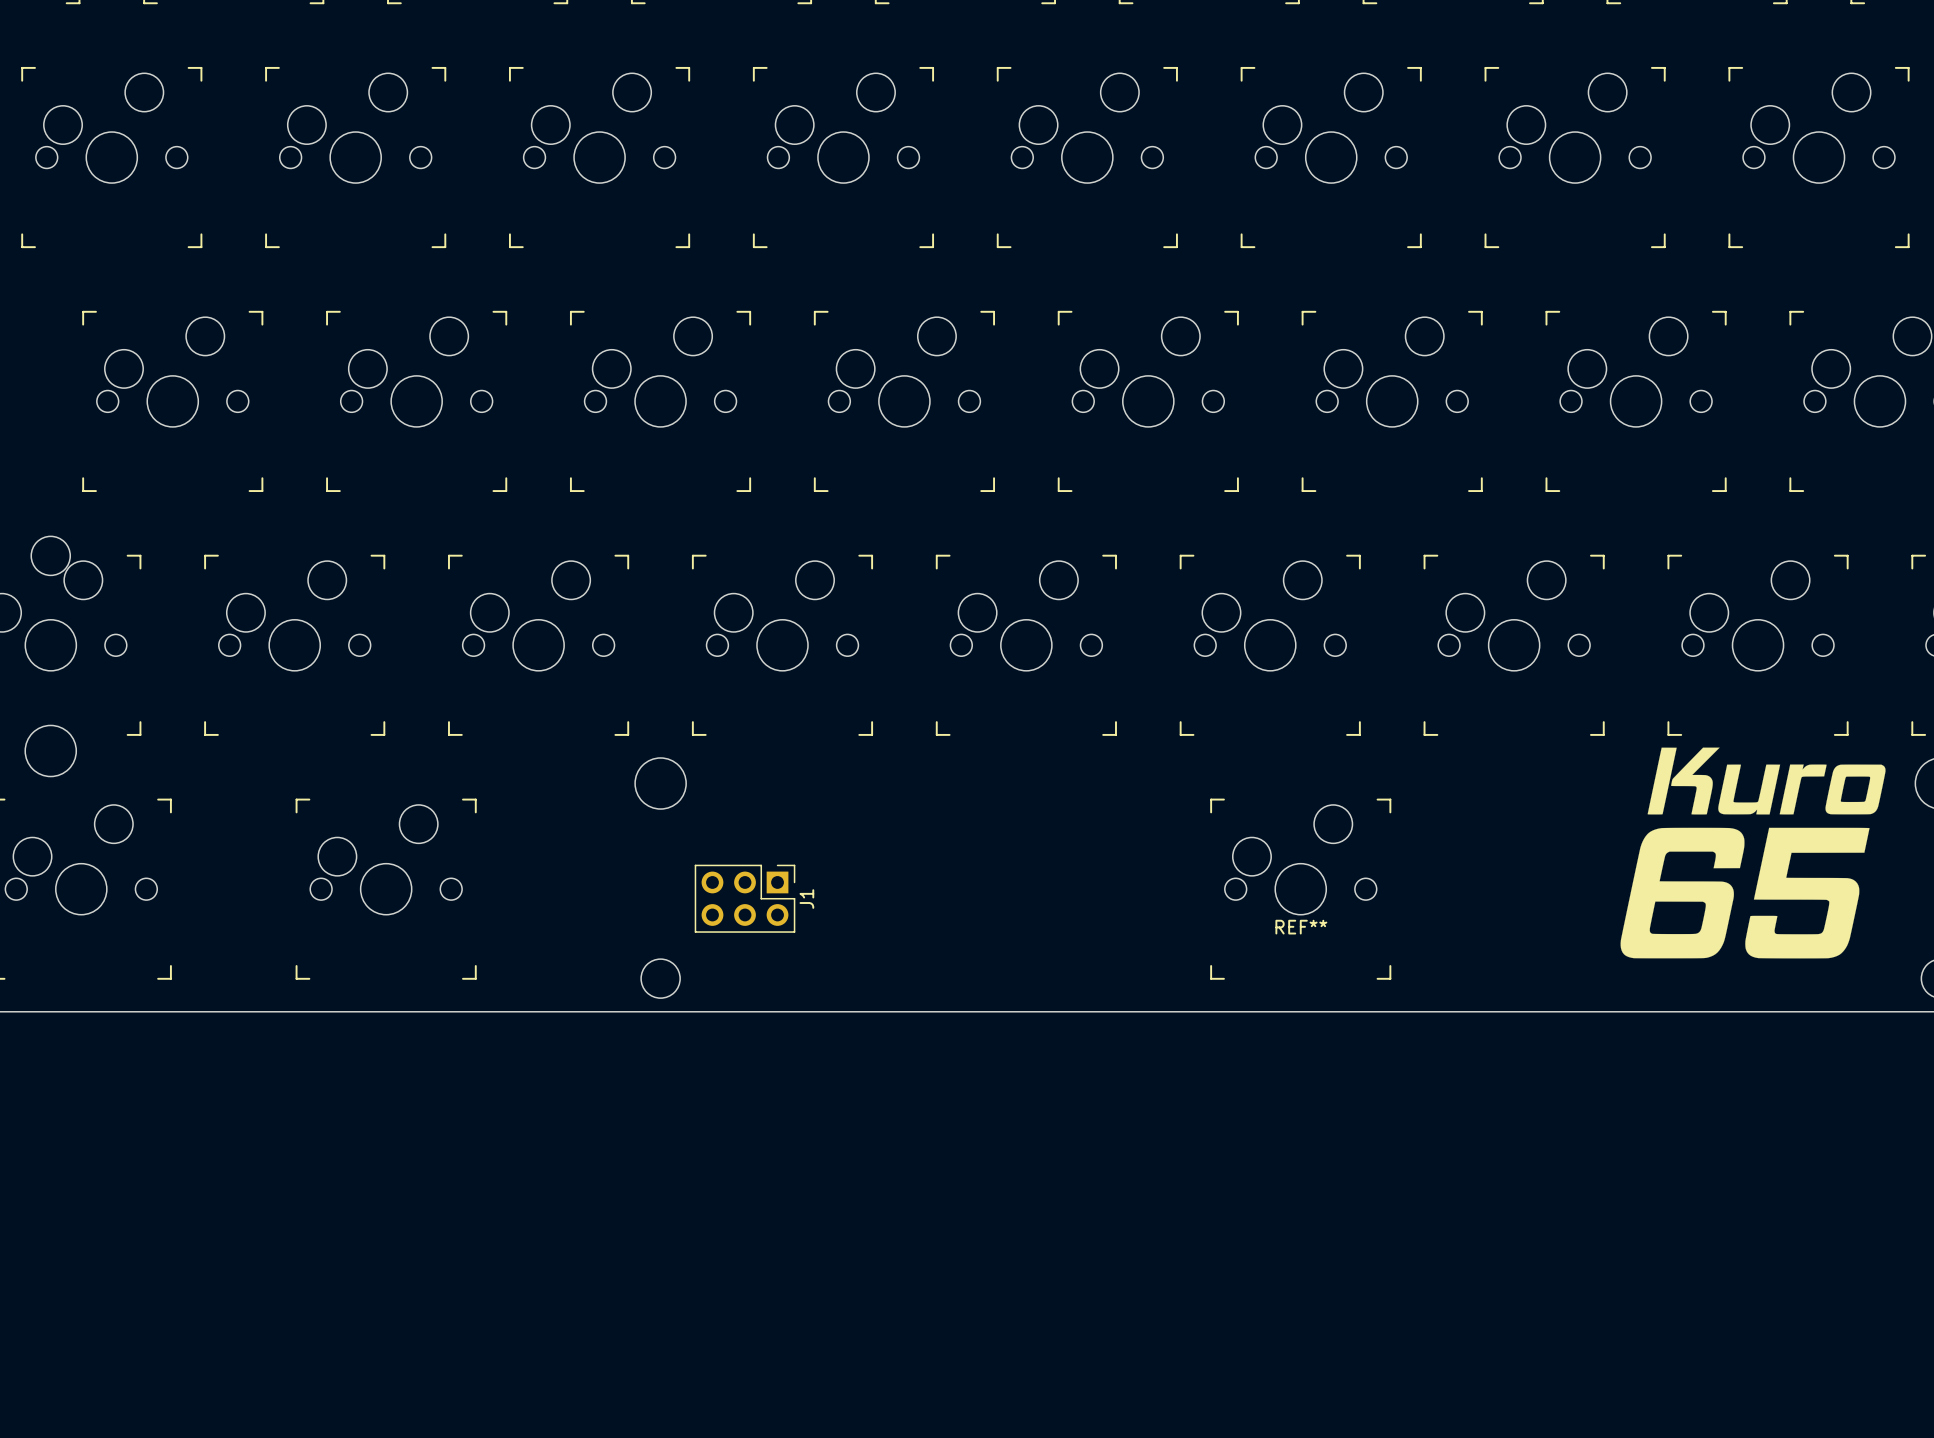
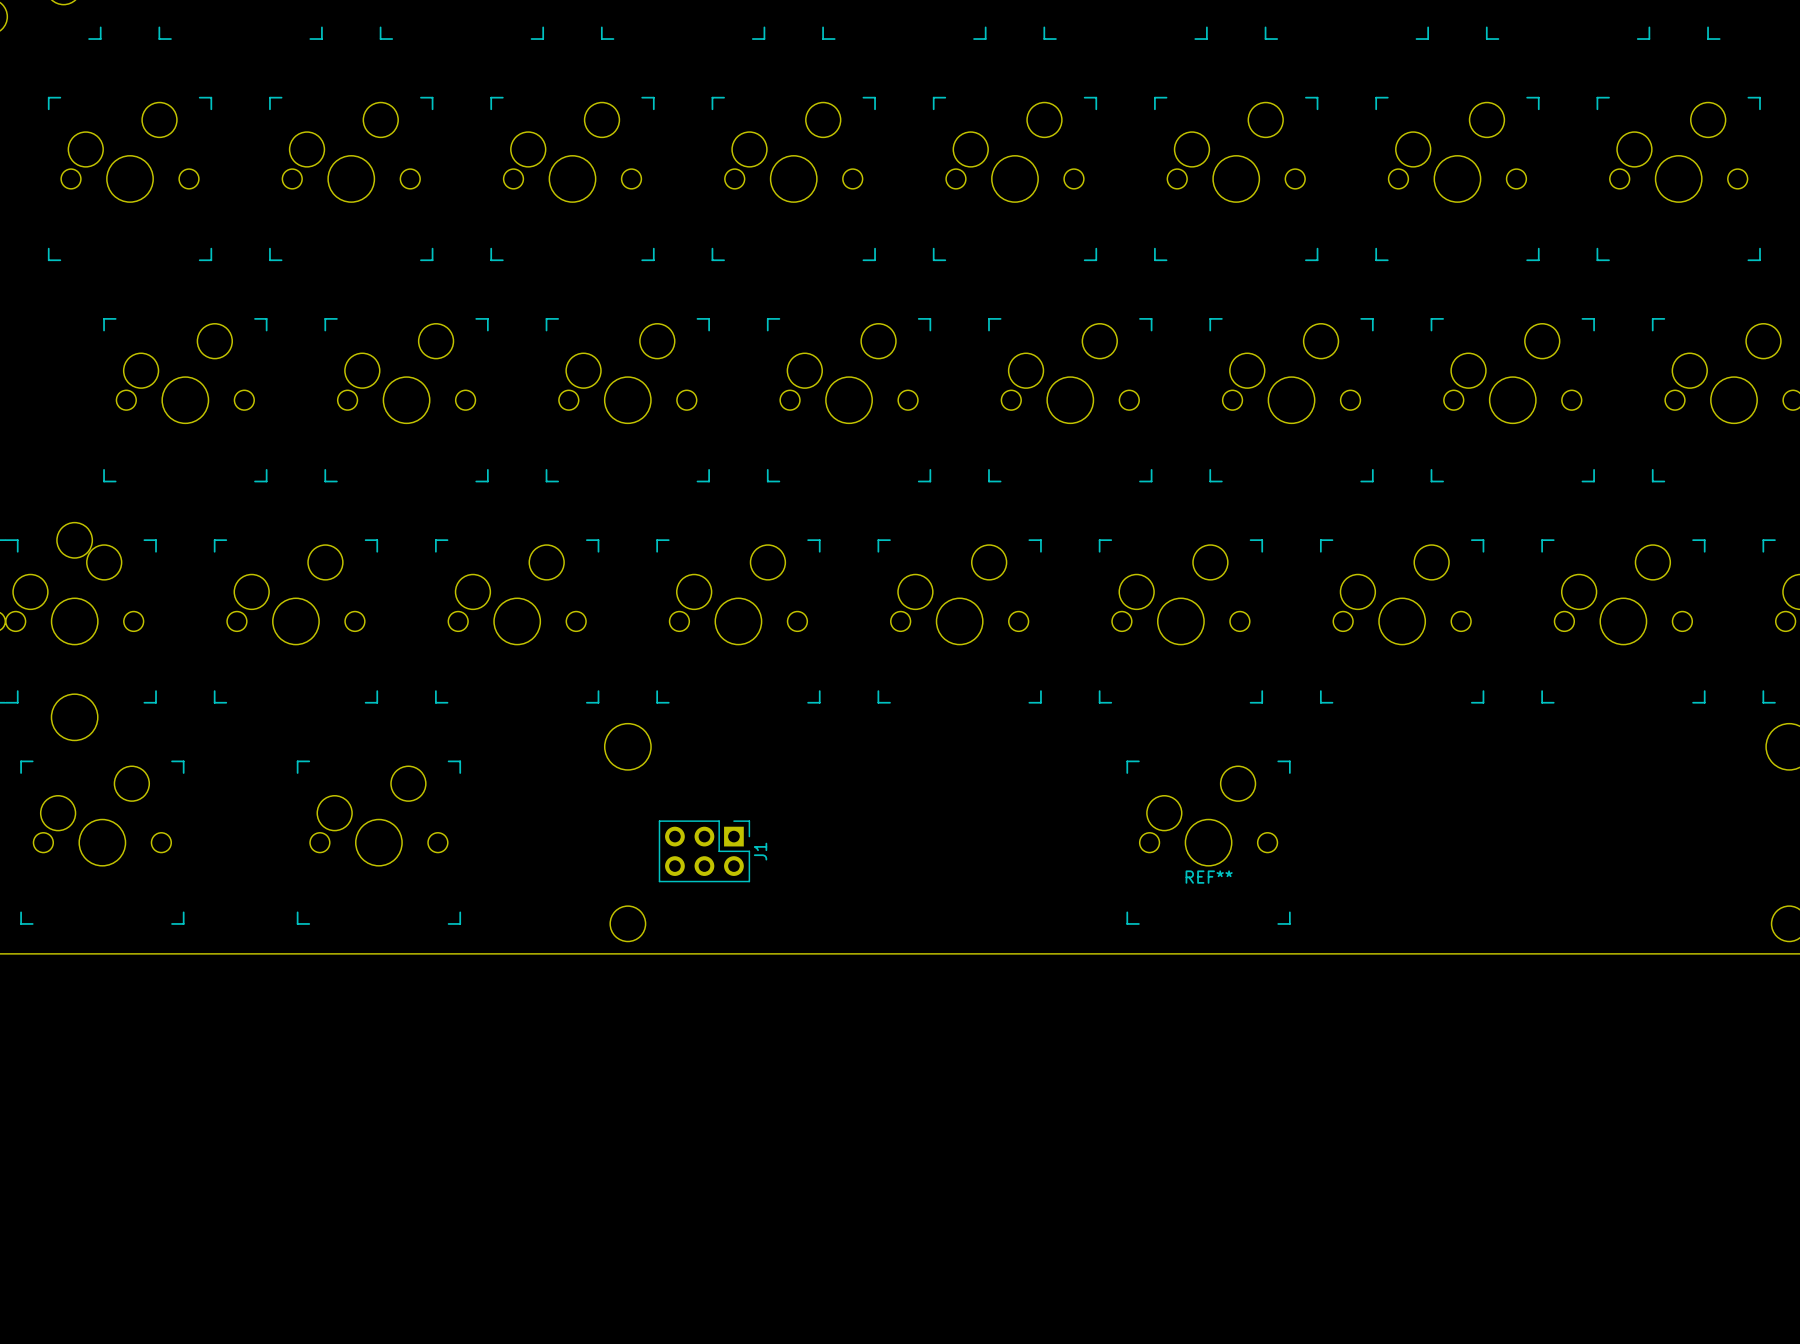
drawing: [1620, 747, 1886, 959] -> none

